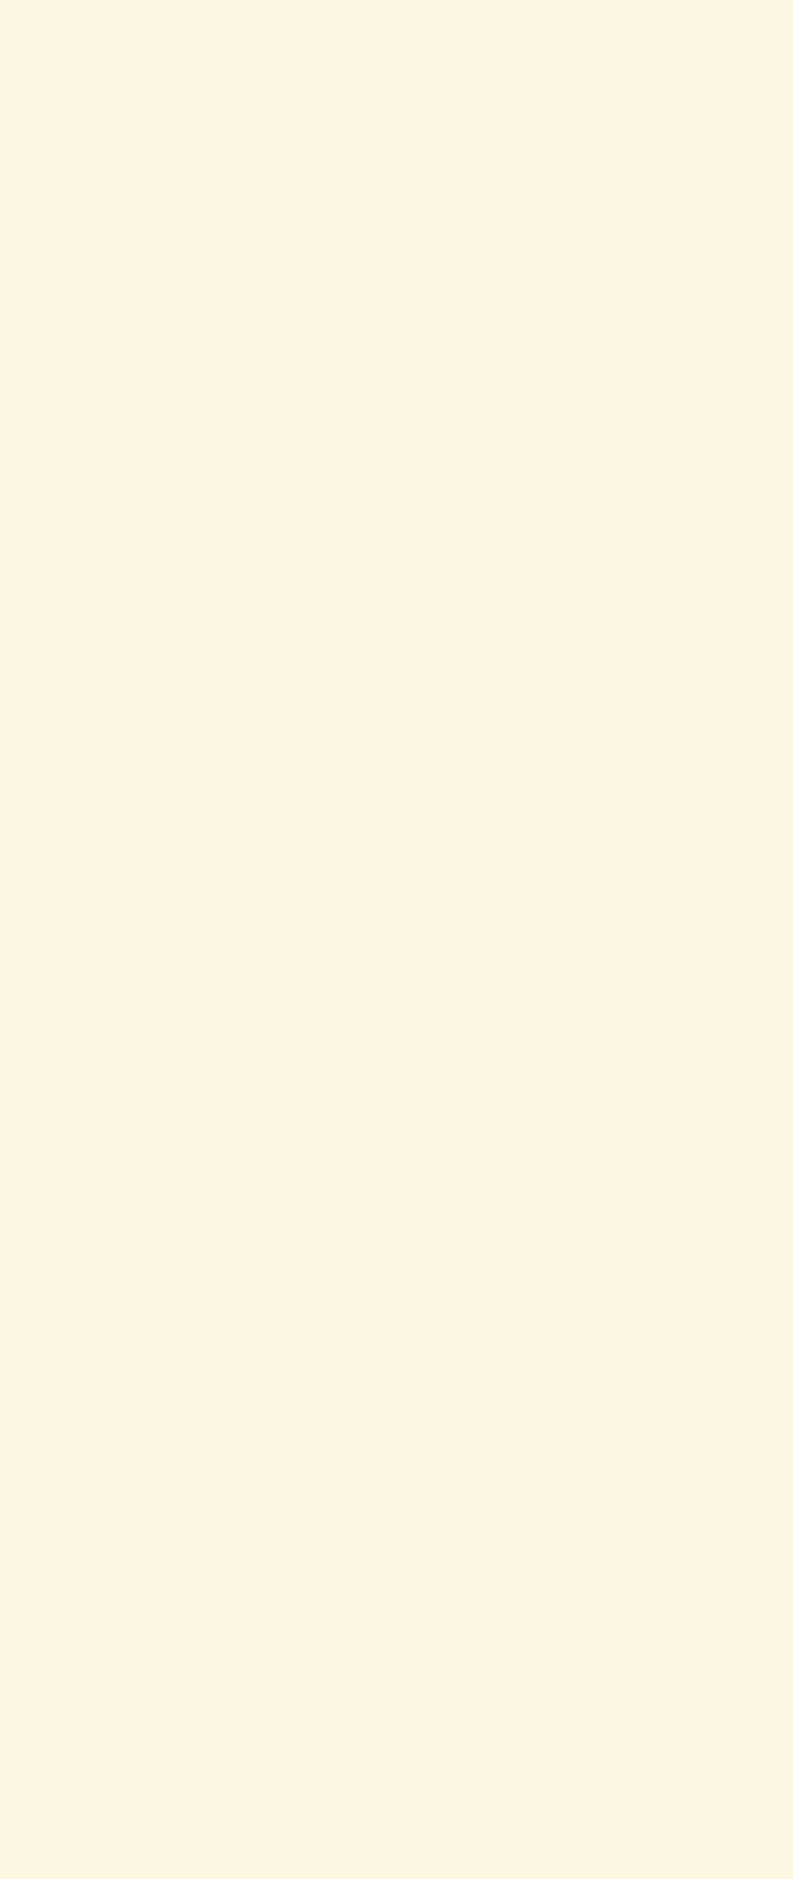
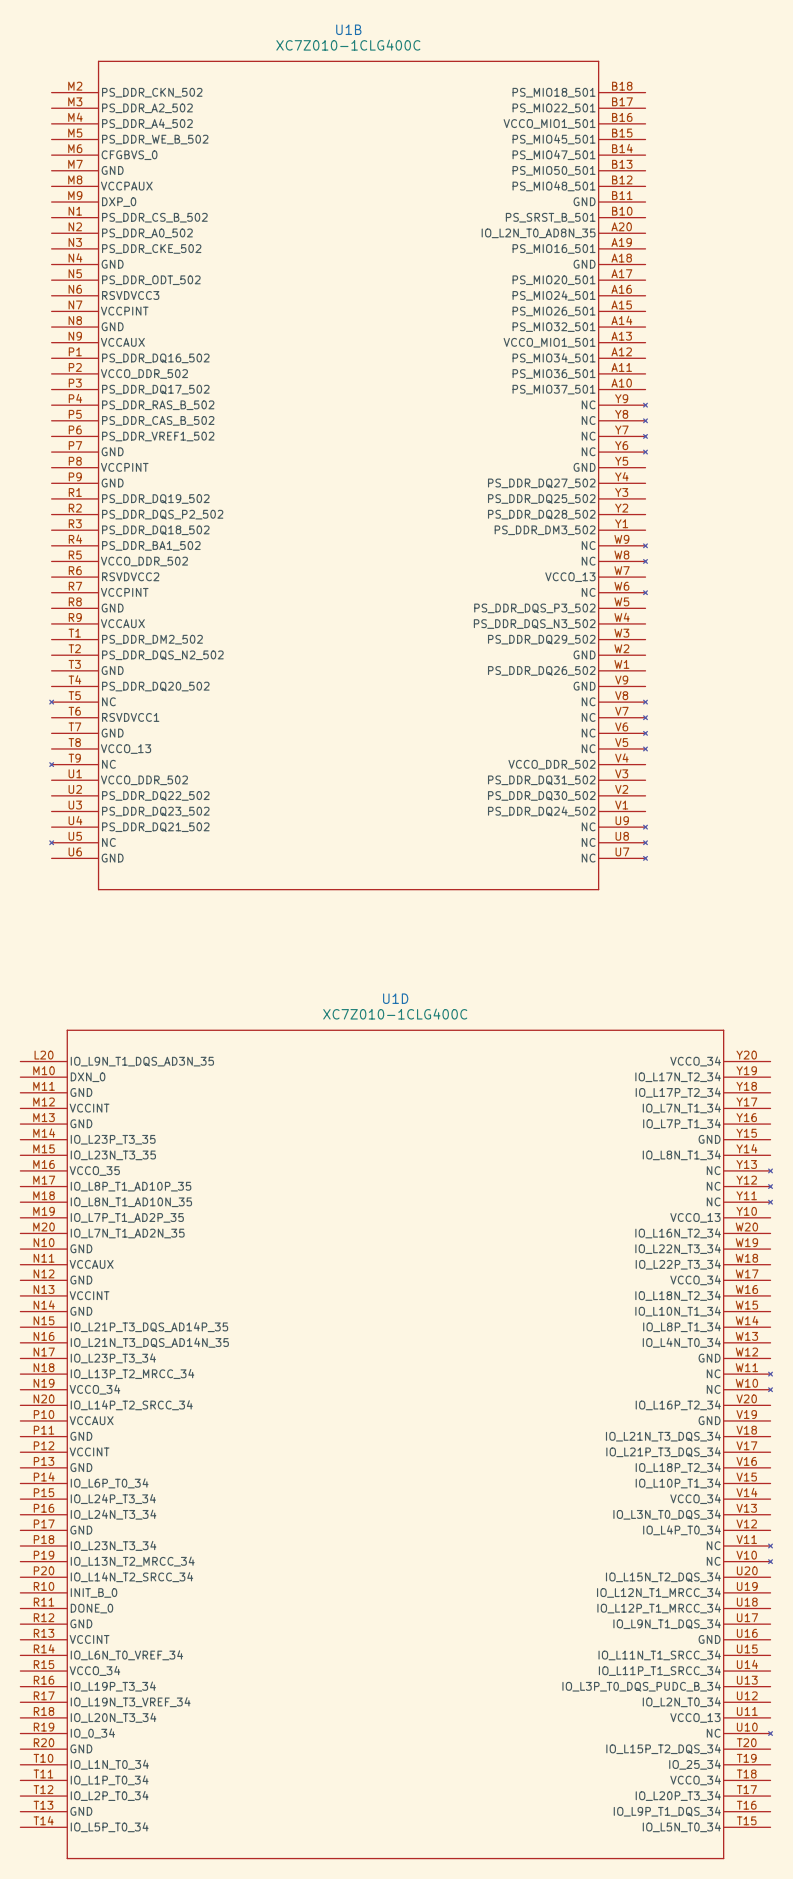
U1B: none -> XC7Z010-1CLG400C (348, 475)
U1D: none -> XC7Z010-1CLG400C (396, 1444)

